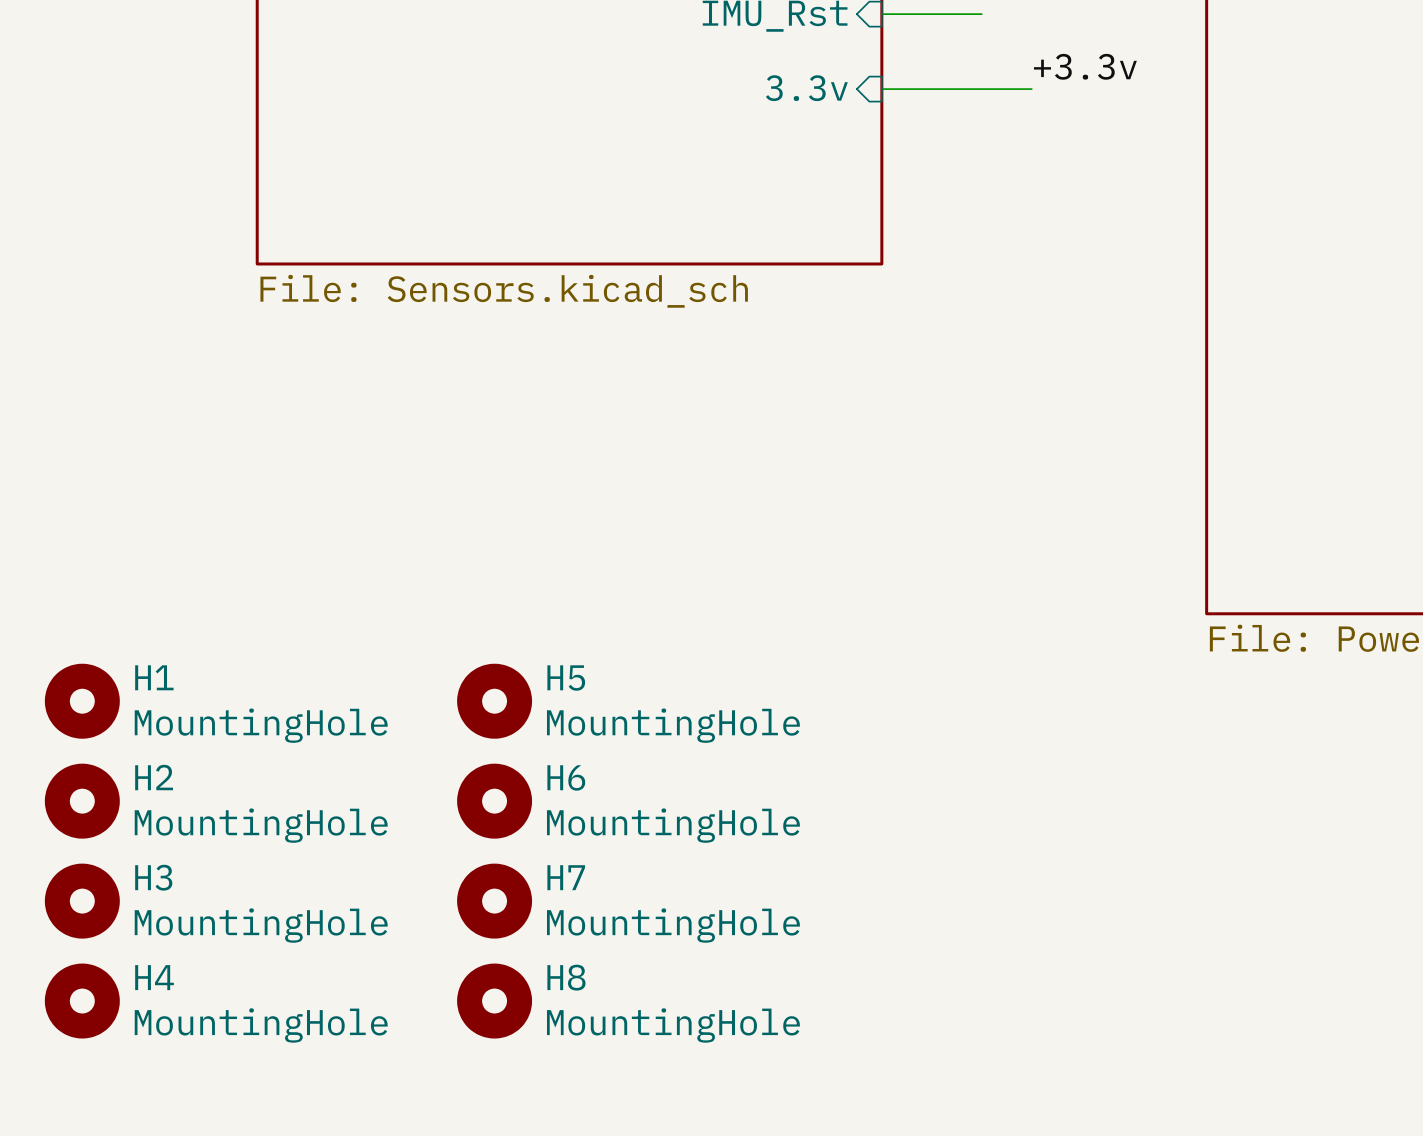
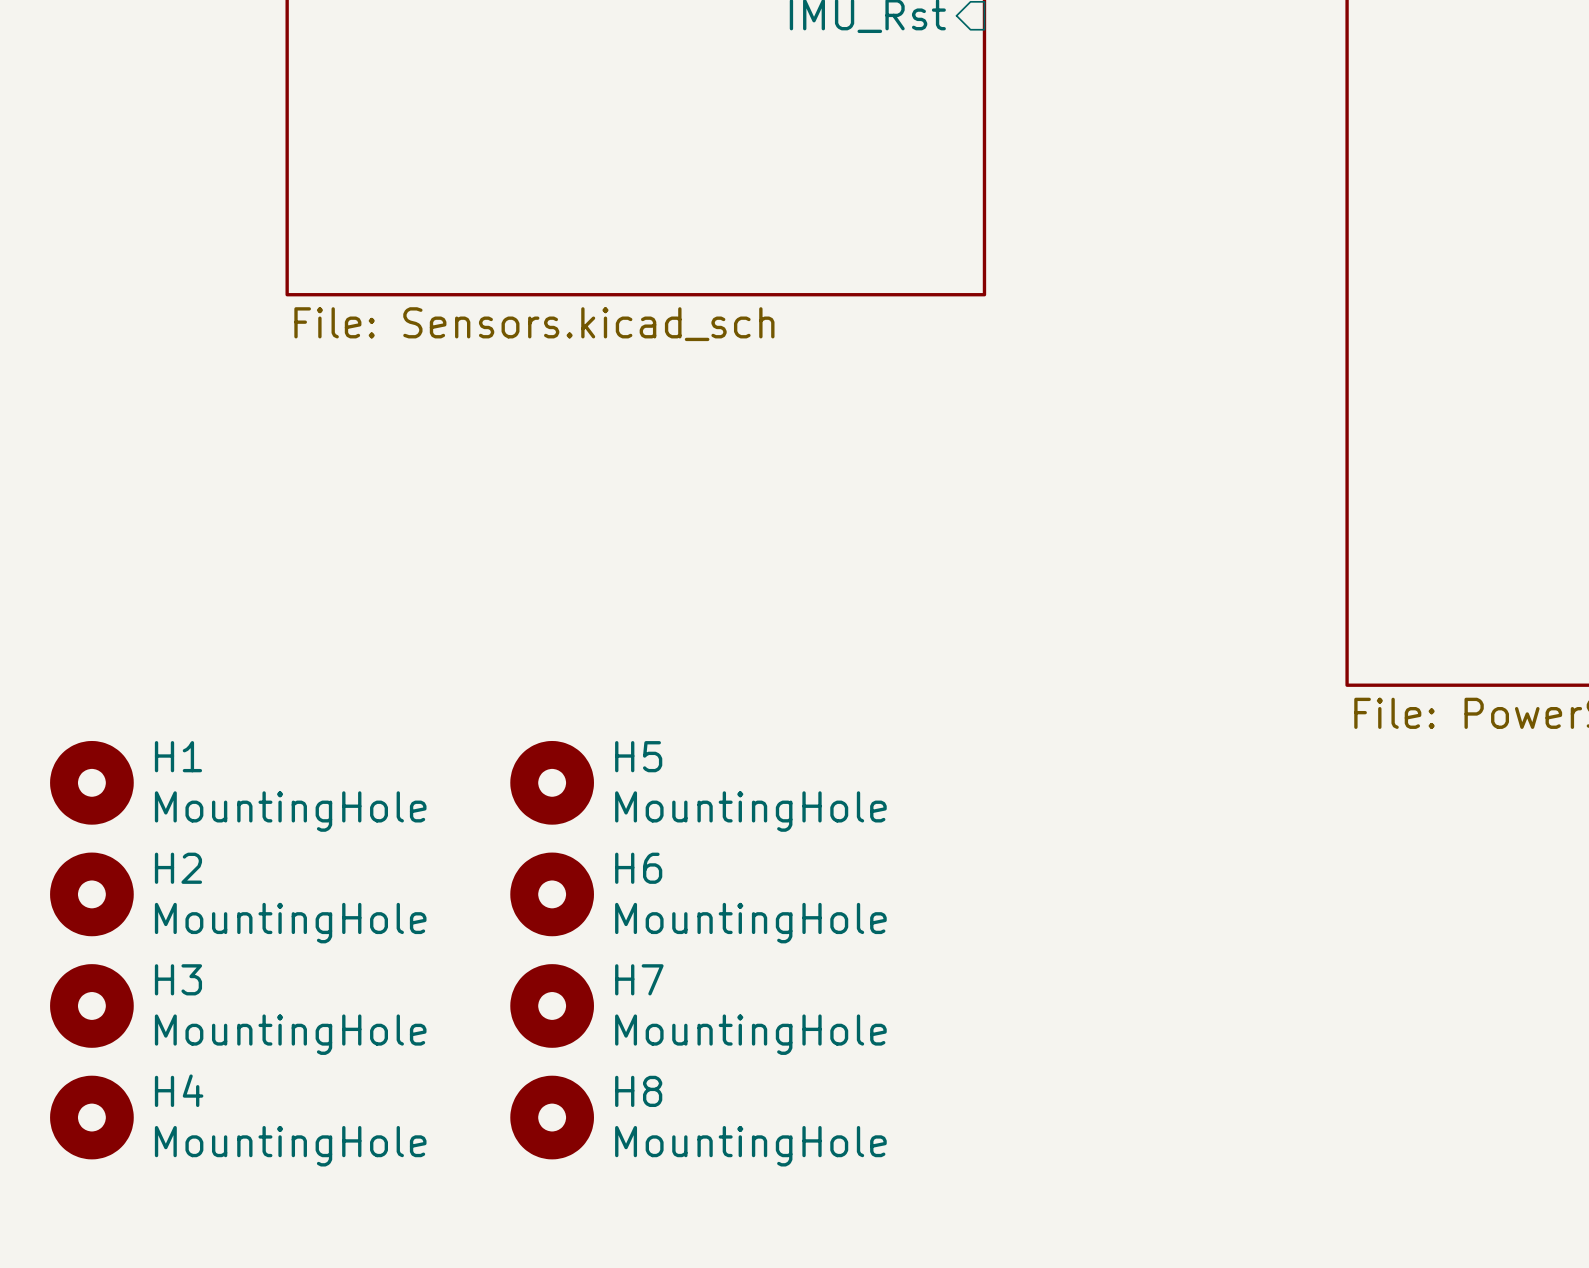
wire: (881, 14) (981, 14) -> none
label: +3.3v (1085, 66) -> none
sheet pin: 3.3v (806, 88) -> none
wire: (881, 89) (1031, 89) -> none

